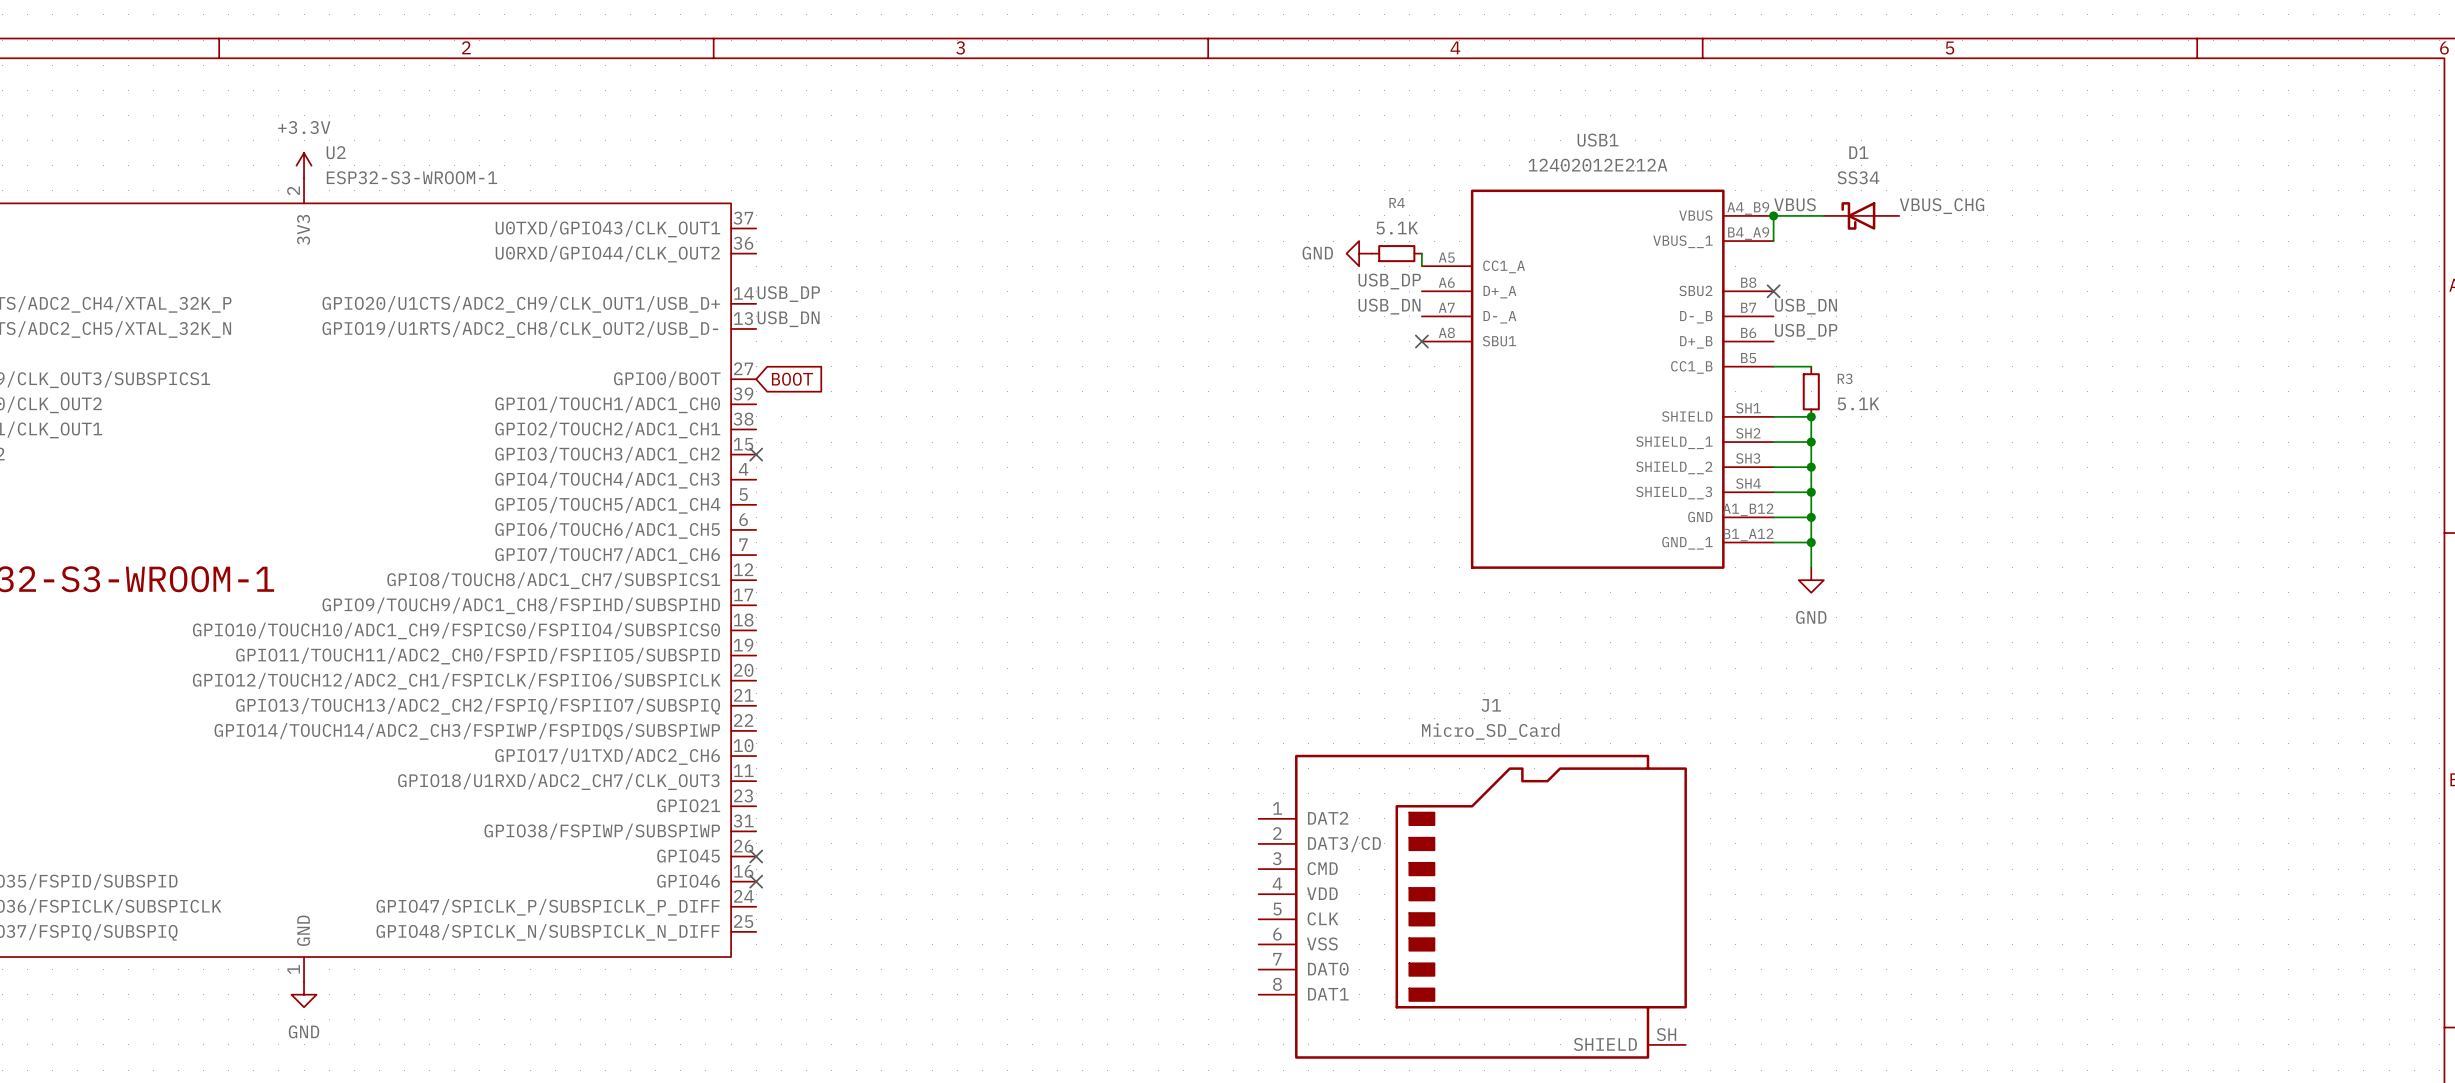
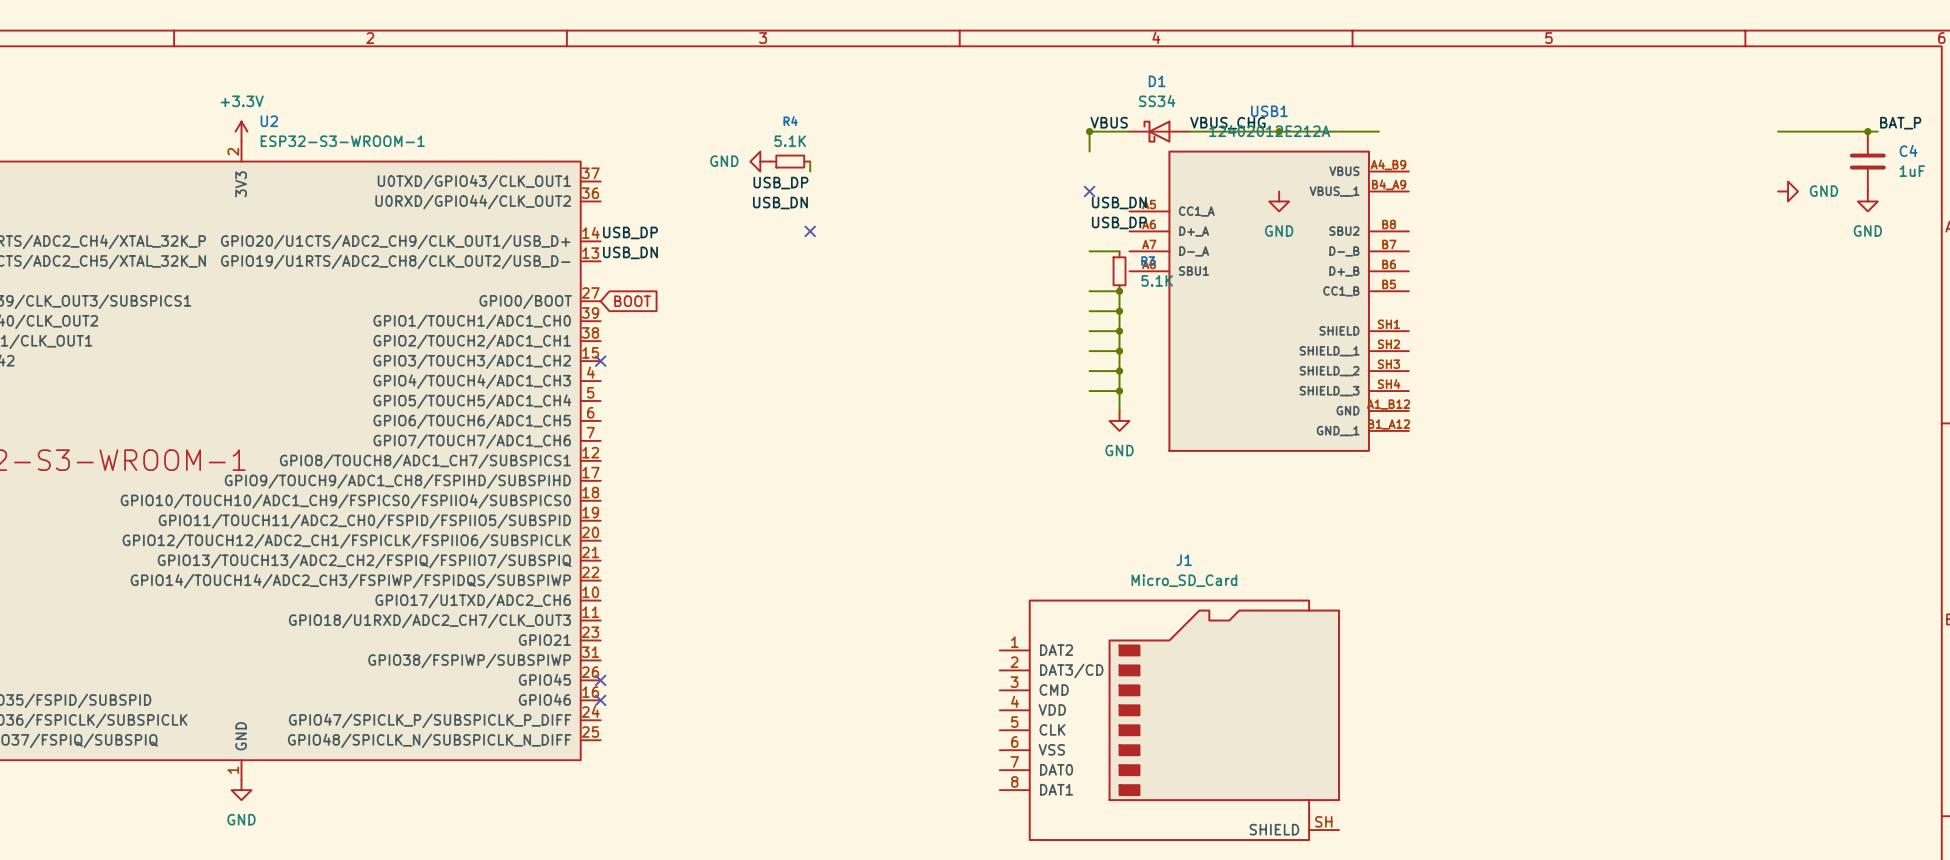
label: none -> VBUS (1109, 122)
label: none -> VBUS_CHG (1227, 123)
label: none -> BAT_P (1900, 123)
junction: none -> (1089, 131)
wire: none -> (1129, 131) (1089, 131) (1089, 151)
wire: none -> (1189, 131) (1378, 131)
junction: none -> (1279, 131)
wire: none -> (1778, 131) (1877, 131)
junction: none -> (1867, 131)
power symbol: none -> GND (760, 161)
wire: none -> (810, 161) (810, 171)
C4: none -> 1uF (1867, 161)
label: VBUS (1794, 204) -> none
label: VBUS_CHG (1942, 206) -> none
junction: (1773, 215) -> none
wire: (1823, 215) (1773, 215) (1773, 241) -> none
D1 position: (1861, 215) -> (1159, 131)
label: none -> USB_DP (780, 183)
no-connect mark: none -> (1089, 191)
power symbol: none -> GND (1788, 191)
power symbol: GND (1359, 253) -> none
R4 position: (1396, 253) -> (790, 161)
wire: (1421, 253) (1421, 266) -> none
power symbol: none -> GND (1279, 201)
power symbol: none -> GND (1867, 201)
label: none -> USB_DN (780, 203)
label position: USB_DP (1389, 281) -> USB_DP (1119, 222)
no-connect mark: none -> (810, 231)
no-connect mark: (1773, 291) -> none
label position: USB_DN (1389, 306) -> USB_DN (1119, 203)
label: USB_DN (1805, 306) -> none
wire: none -> (1089, 251) (1119, 251)
label: USB_DP (1806, 331) -> none
no-connect mark: (1421, 341) -> none
wire: none -> (1089, 291) (1119, 291) (1119, 410)
junction: none -> (1119, 291)
wire: (1773, 366) (1811, 366) -> none
wire: none -> (1089, 311) (1119, 311)
junction: none -> (1119, 311)
R3 position: (1811, 391) -> (1119, 271)
wire: none -> (1089, 331) (1119, 331)
junction: none -> (1119, 331)
wire: (1773, 416) (1811, 416) (1811, 567) -> none
junction: (1811, 416) -> none
wire: none -> (1089, 351) (1119, 351)
junction: none -> (1119, 351)
wire: (1773, 442) (1811, 442) -> none
junction: (1811, 442) -> none
wire: none -> (1089, 371) (1119, 371)
junction: none -> (1119, 371)
wire: (1773, 467) (1811, 467) -> none
junction: (1811, 467) -> none
wire: none -> (1089, 391) (1119, 391)
junction: none -> (1119, 391)
wire: (1773, 492) (1811, 492) -> none
junction: (1811, 492) -> none
wire: (1773, 517) (1811, 517) -> none
junction: (1811, 517) -> none
power symbol: none -> GND (1119, 420)
wire: (1773, 542) (1811, 542) -> none
junction: (1811, 542) -> none
power symbol: GND (1811, 580) -> none

